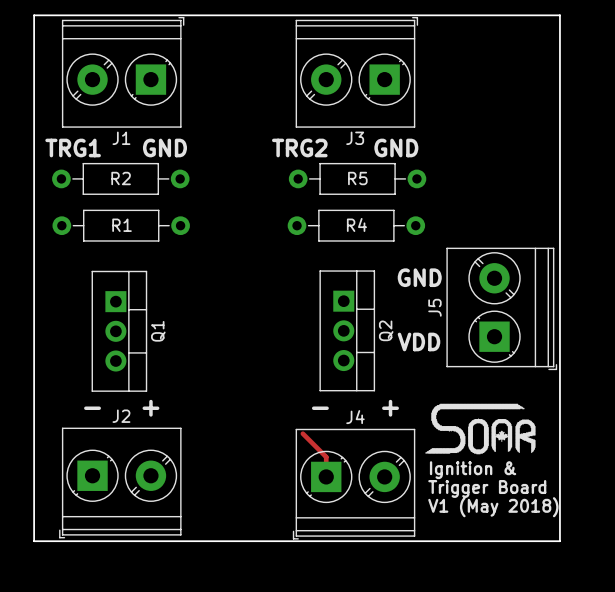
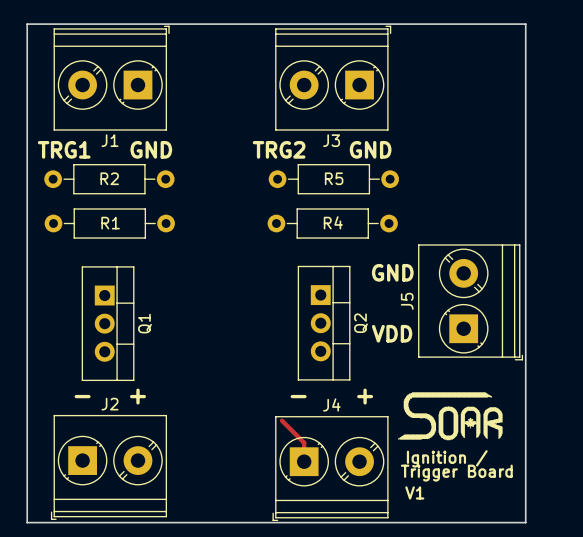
text: Ignition & (473, 470) -> Ignition / (447, 458)
text: V1 (May 2018) (493, 507) -> V1 (414, 492)

